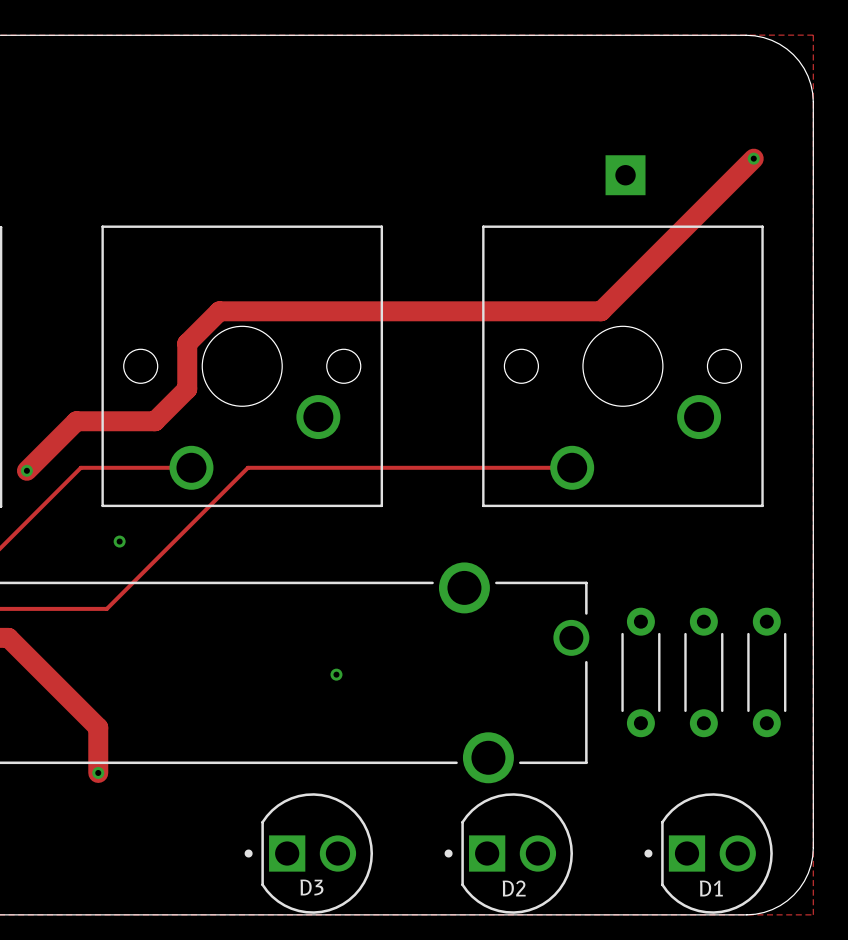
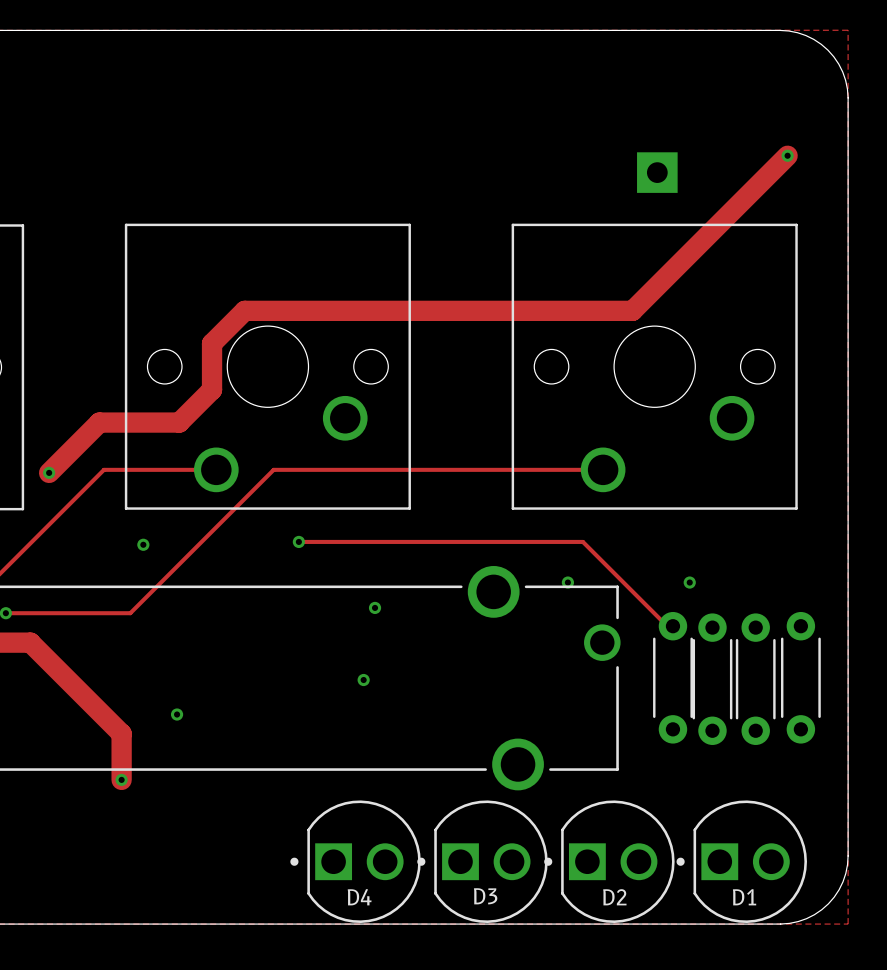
track: none -> (298, 541) (582, 541) (669, 628)
via: none -> (298, 541)
via: none -> (567, 582)
via: none -> (689, 582)
via: none -> (375, 607)
part: (703, 672) -> none
part: none -> (712, 679)
part: none -> (755, 679)
via: none -> (177, 714)
D3 position: (308, 853) -> (482, 861)
D4: none -> (355, 861)
D2 position: (508, 853) -> (609, 861)

